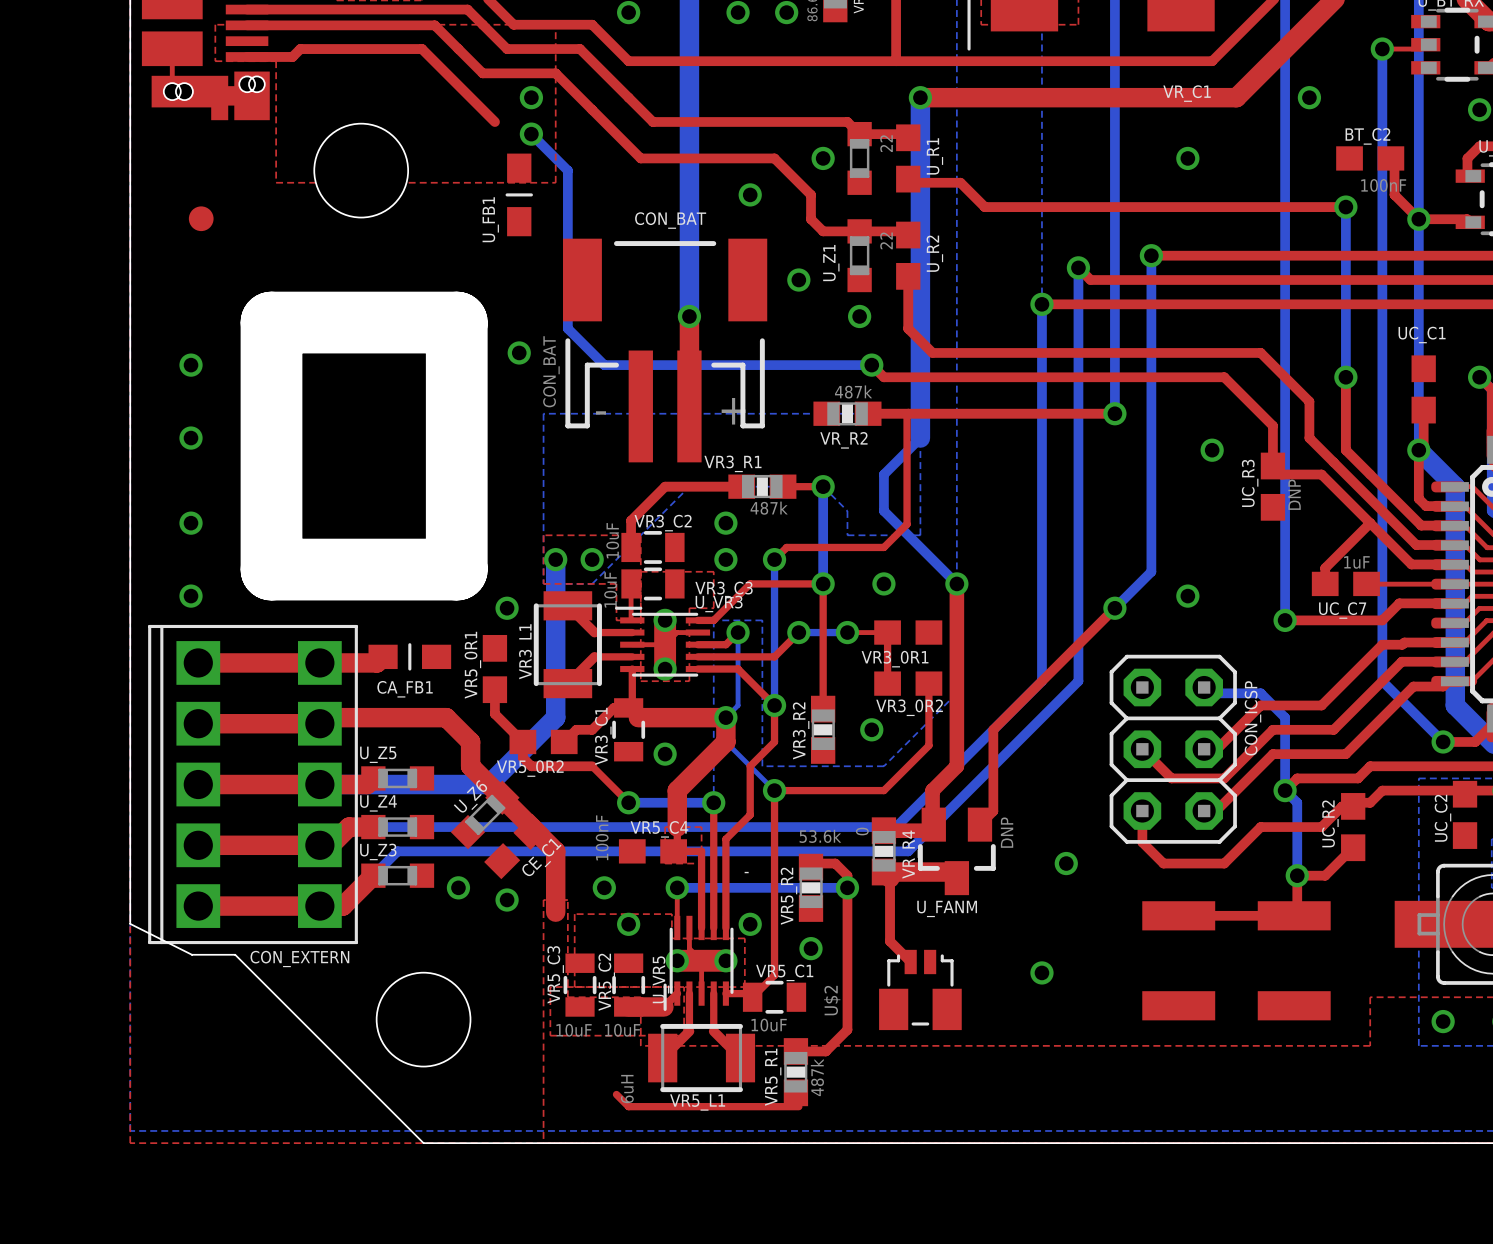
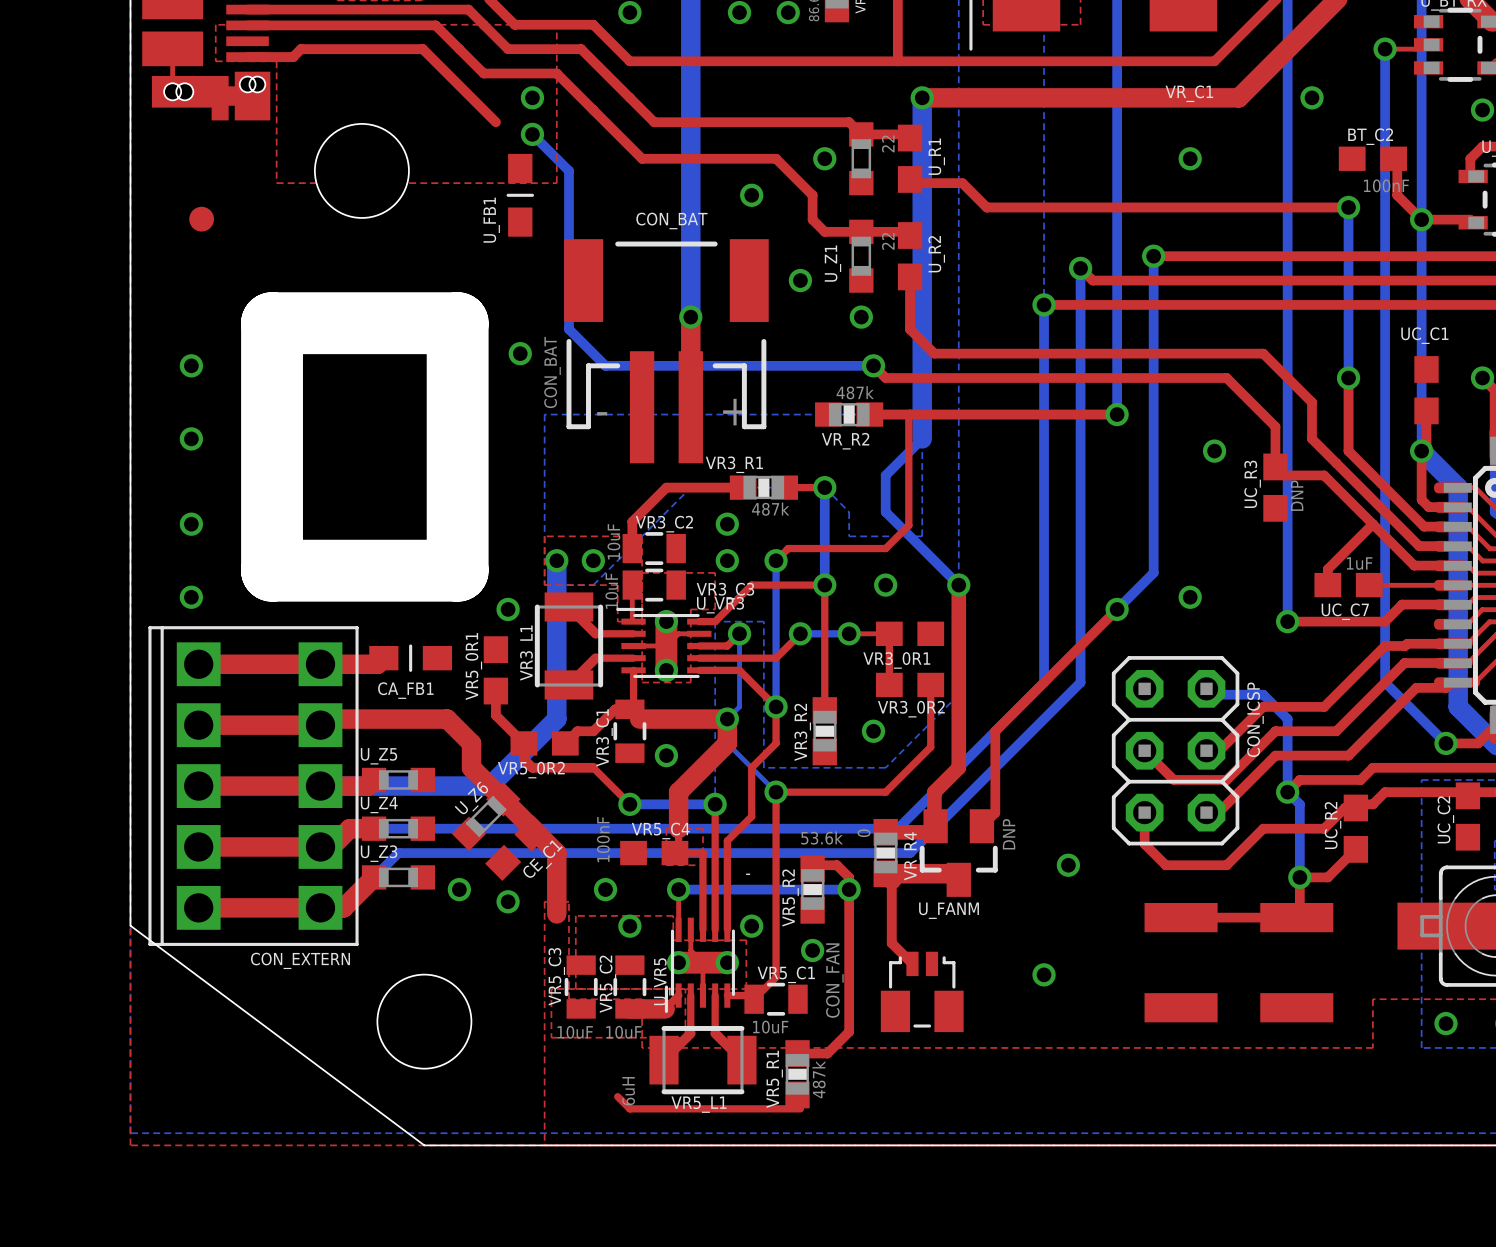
board edge: (130, 923) (191, 954) (235, 954) (423, 1143) -> (130, 925) (424, 1145)
U$2 name: U$2 (832, 1000) -> CON_FAN (834, 980)

